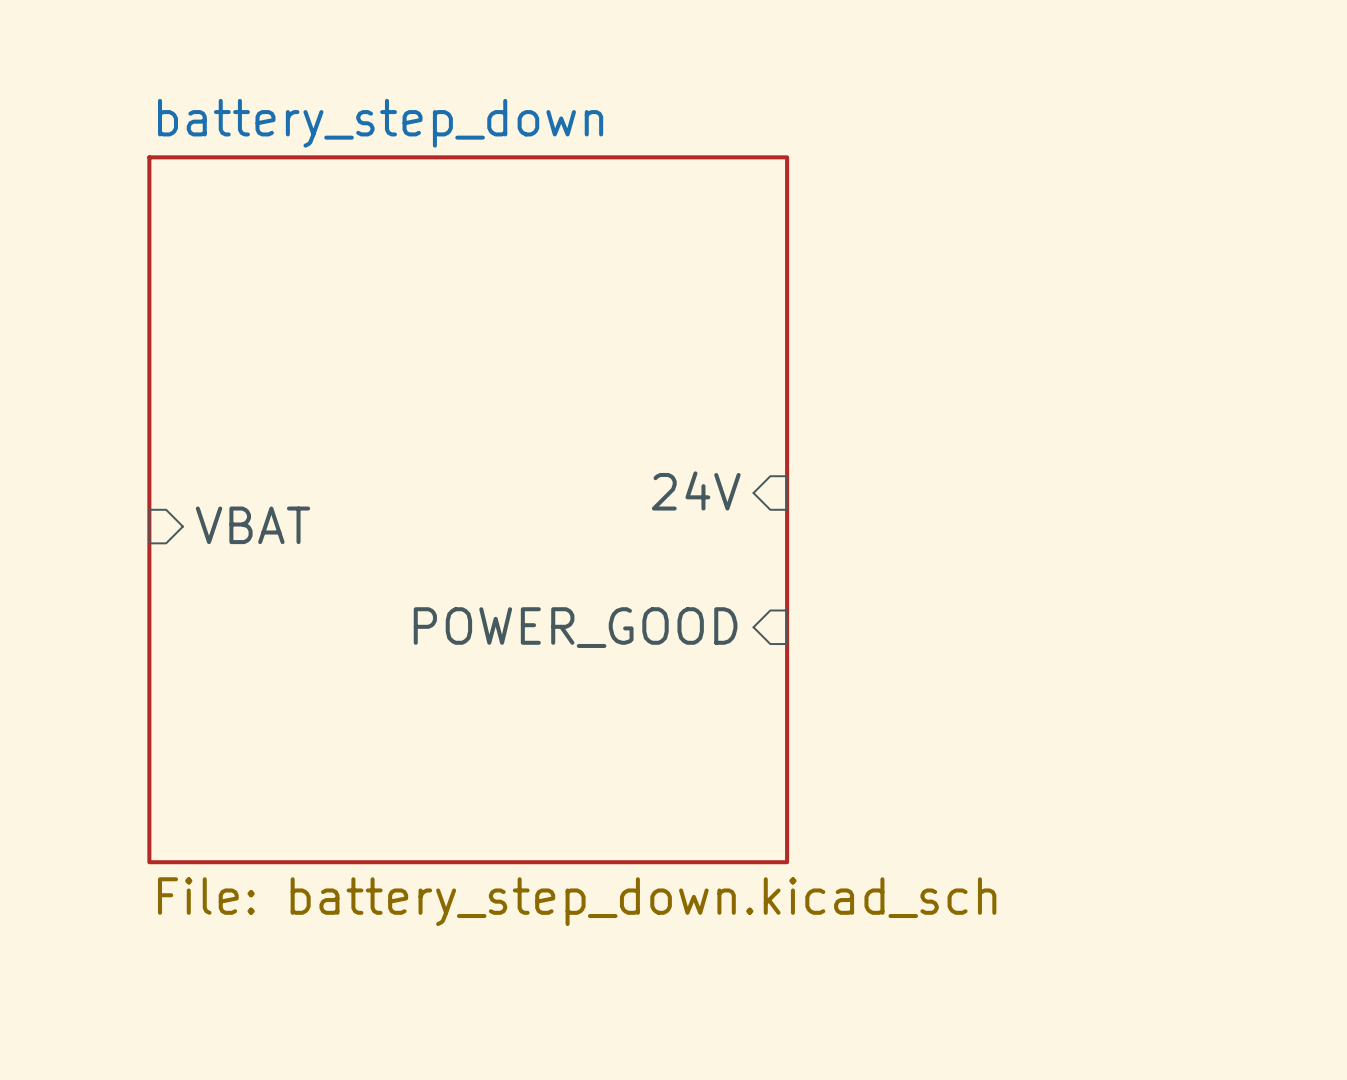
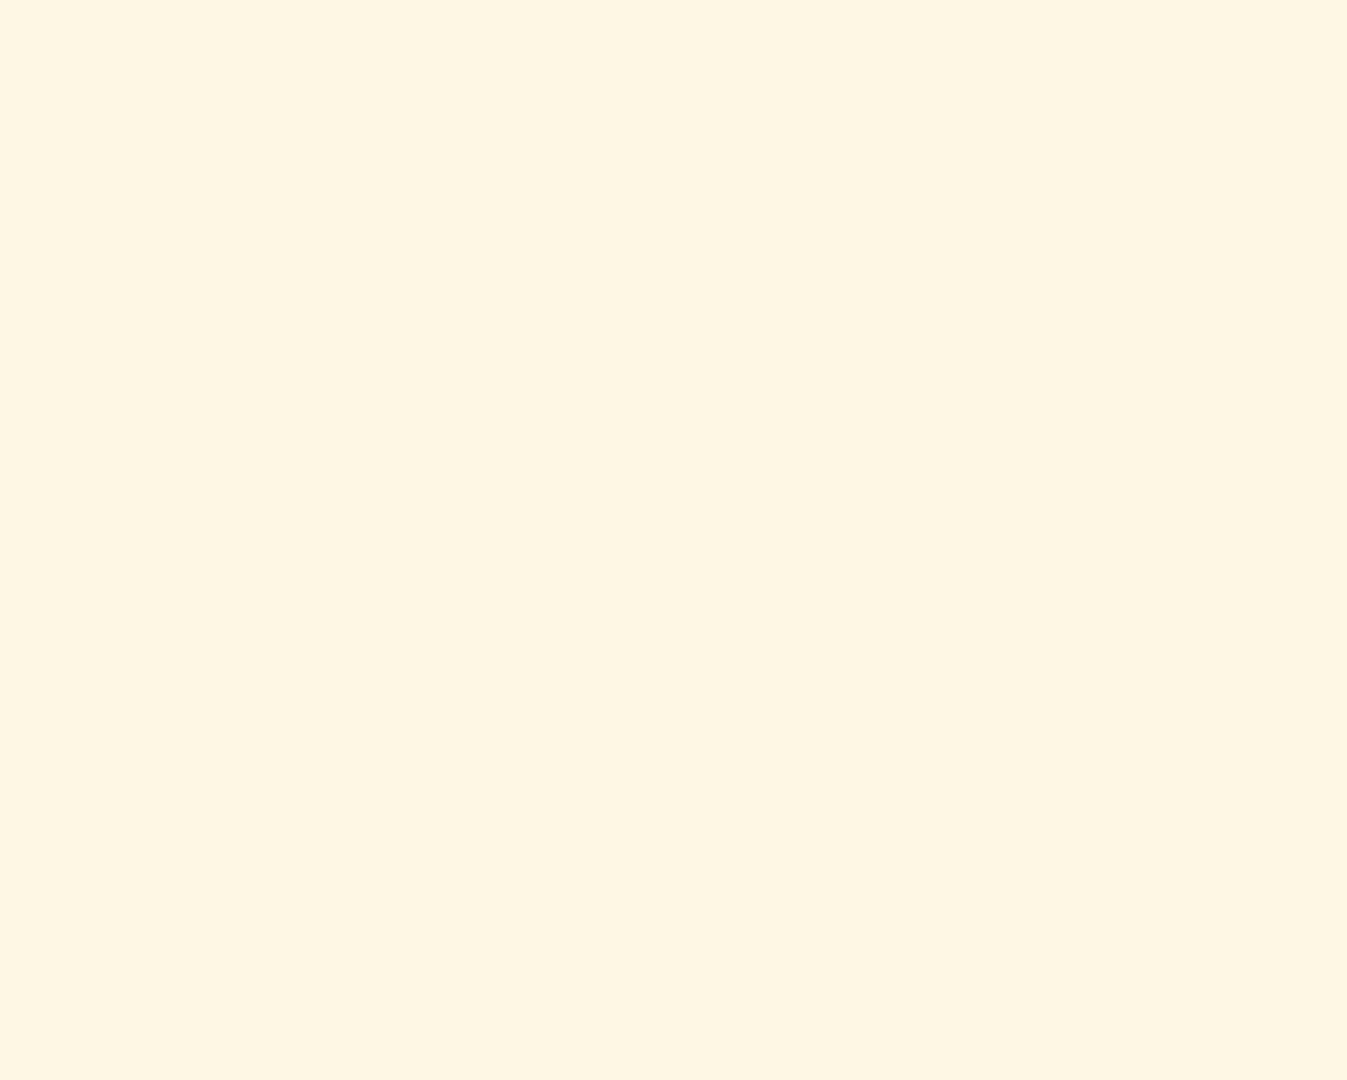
sheet pin: 24V (696, 490) -> none
sheet battery_step_down: File: battery_step_down.kicad_sch (468, 509) -> none
sheet pin: VBAT (252, 525) -> none
sheet pin: POWER_GOOD (575, 627) -> none

